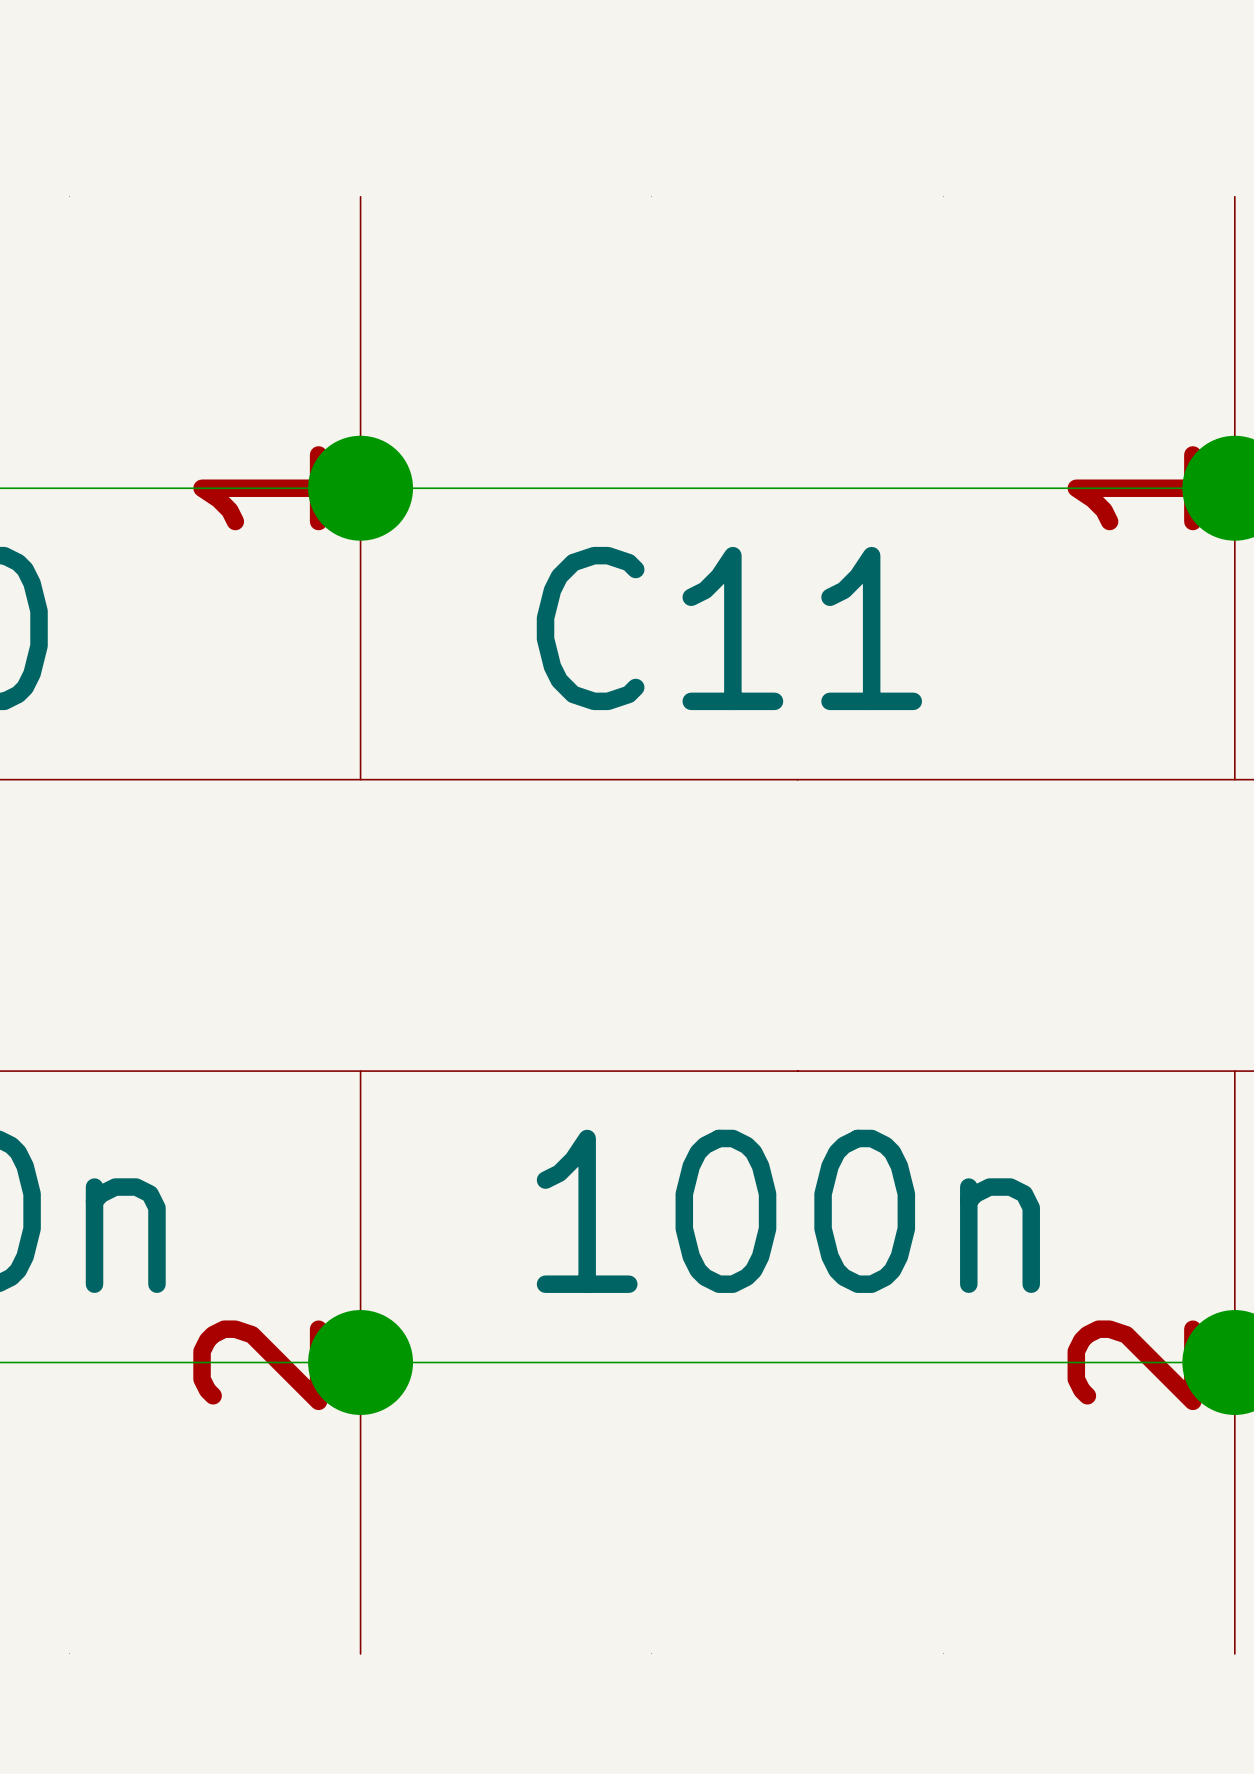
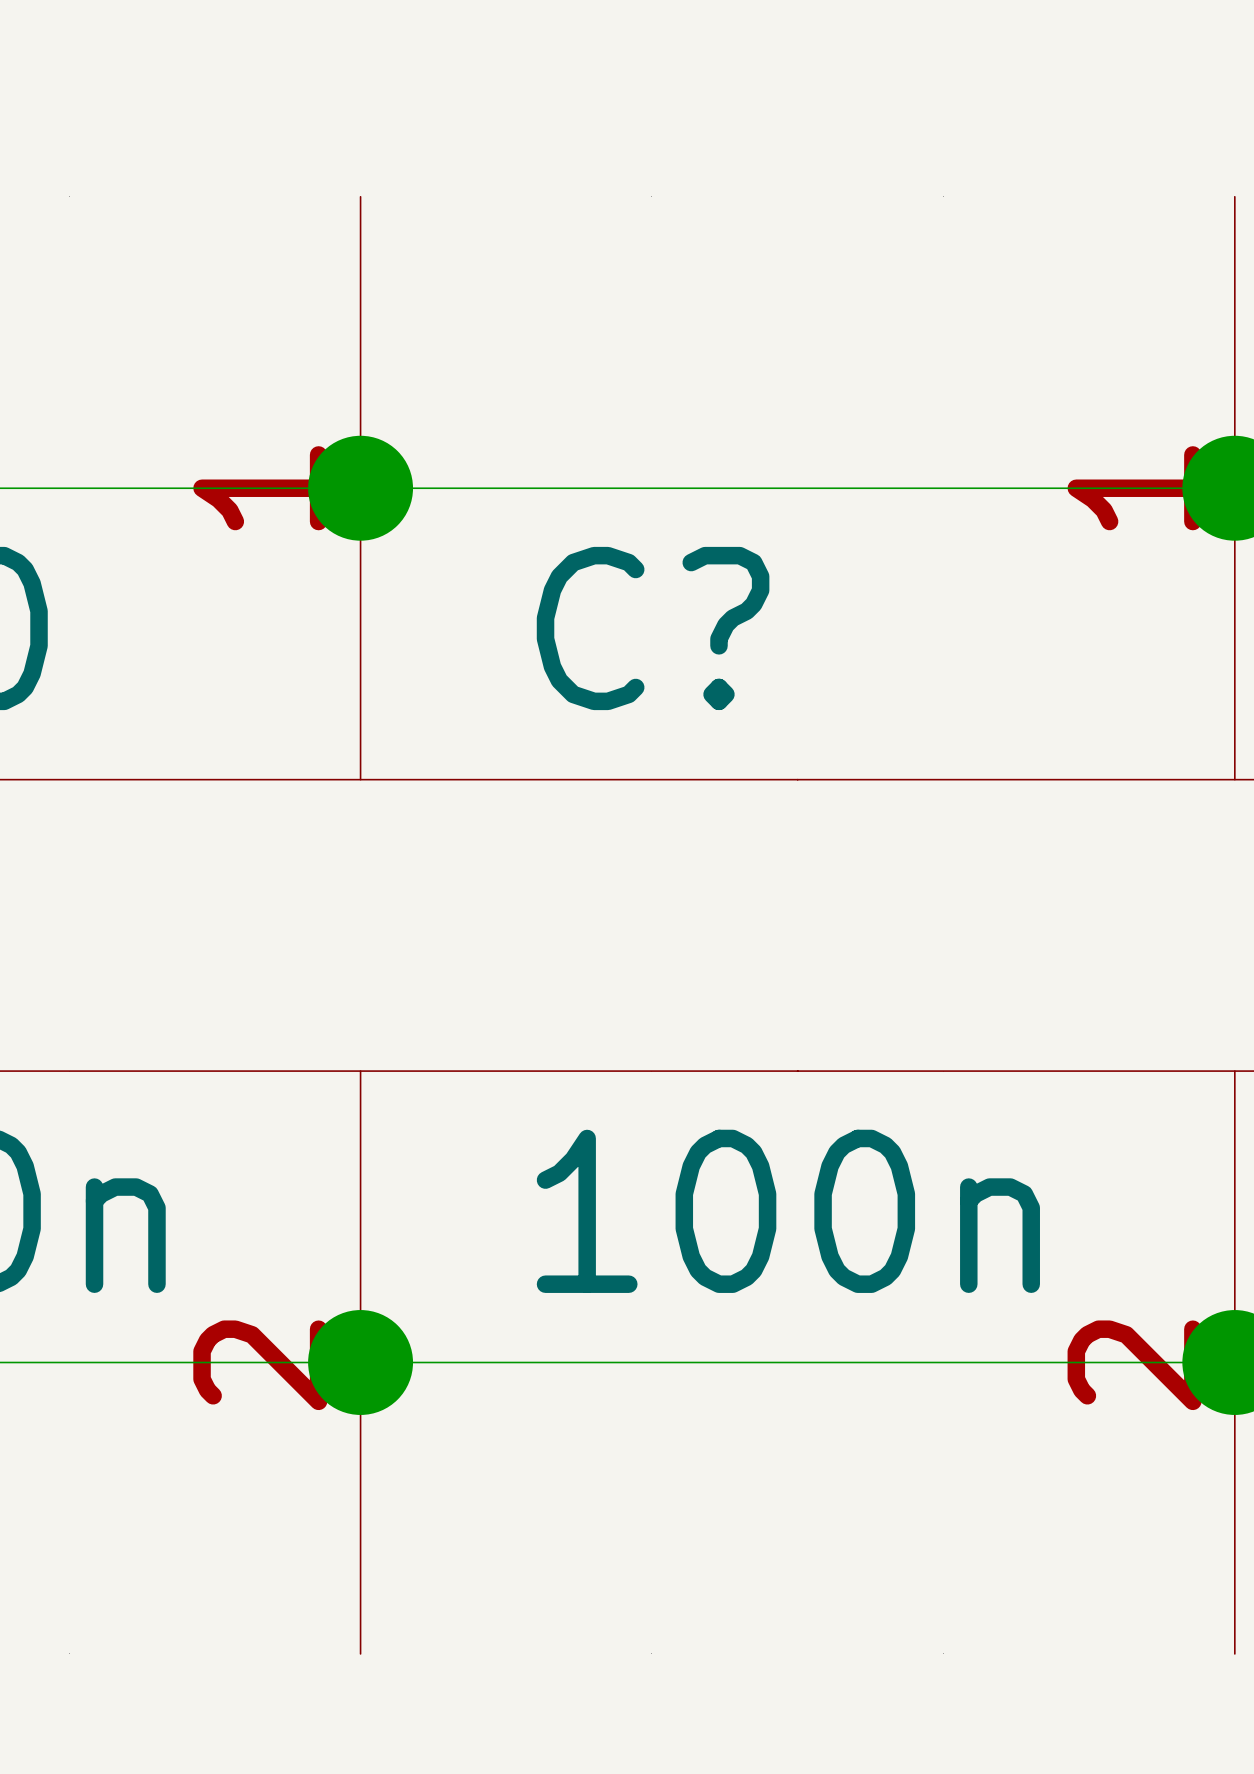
C11 name: C11 (729, 628) -> C? (653, 628)

